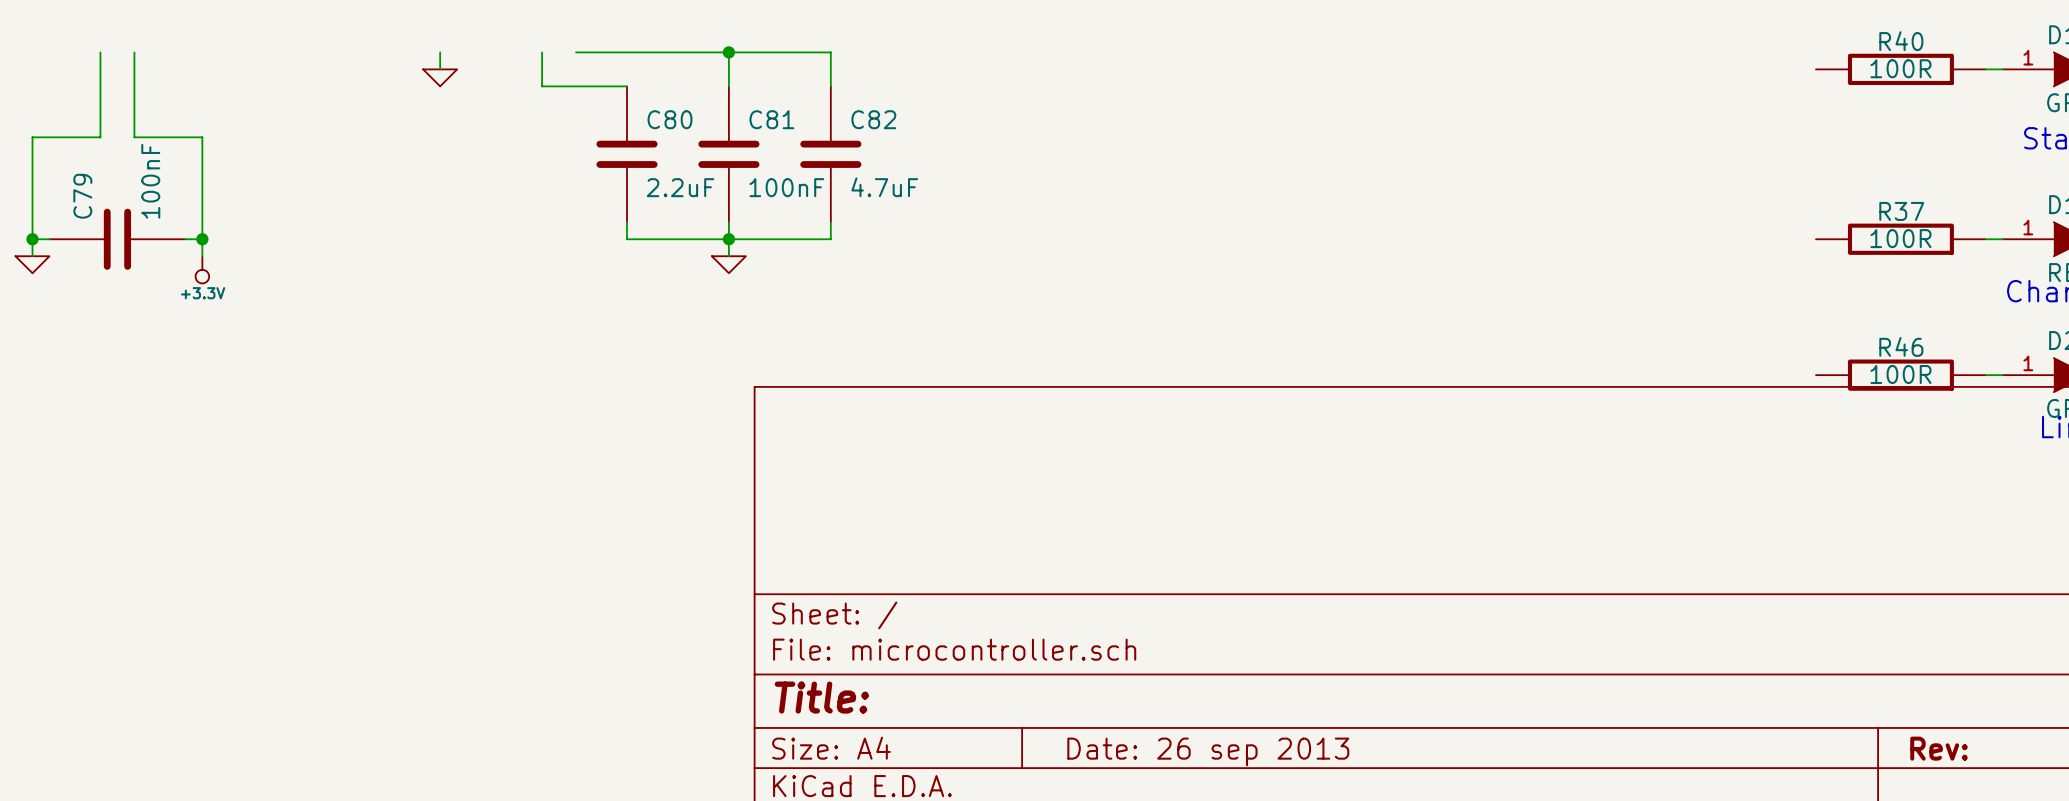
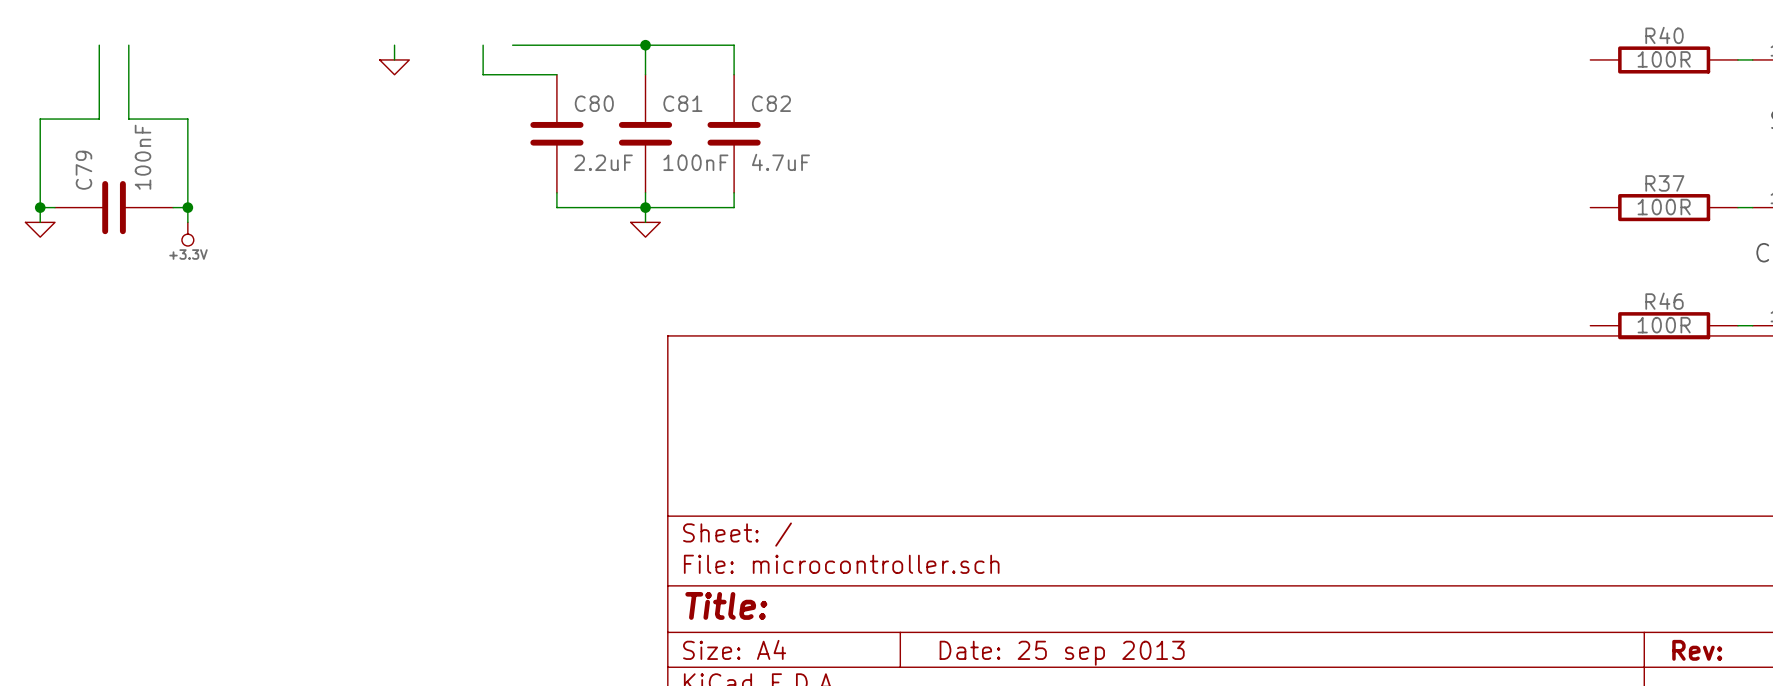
title block: Date: 26 sep 2013 (1208, 751) -> Date: 25 sep 2013 (1062, 653)

